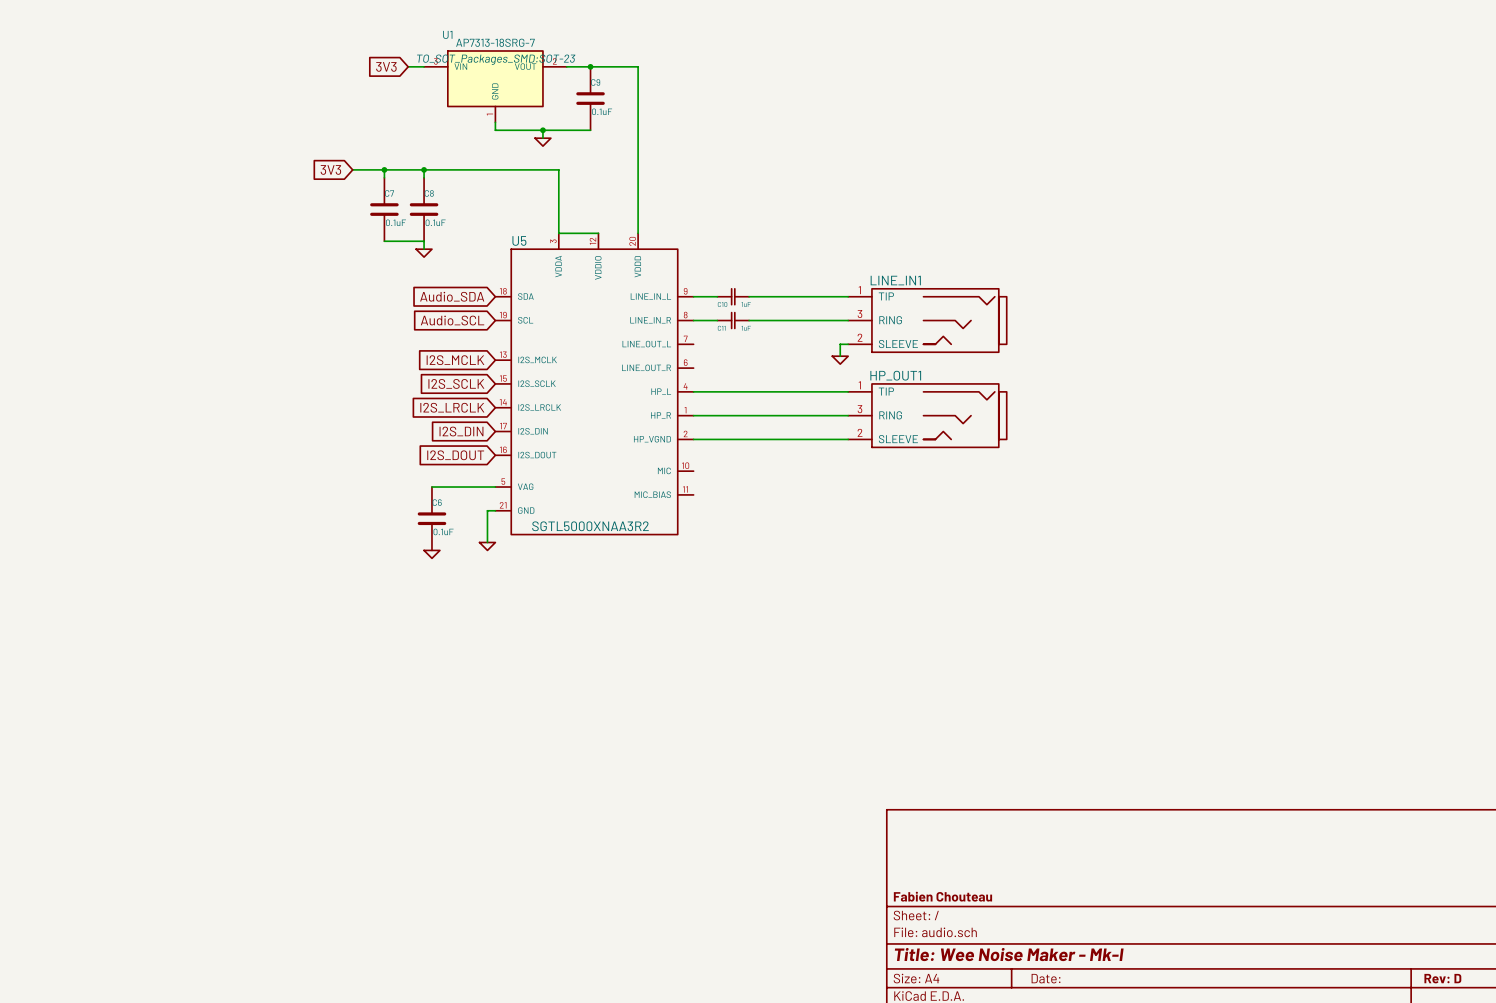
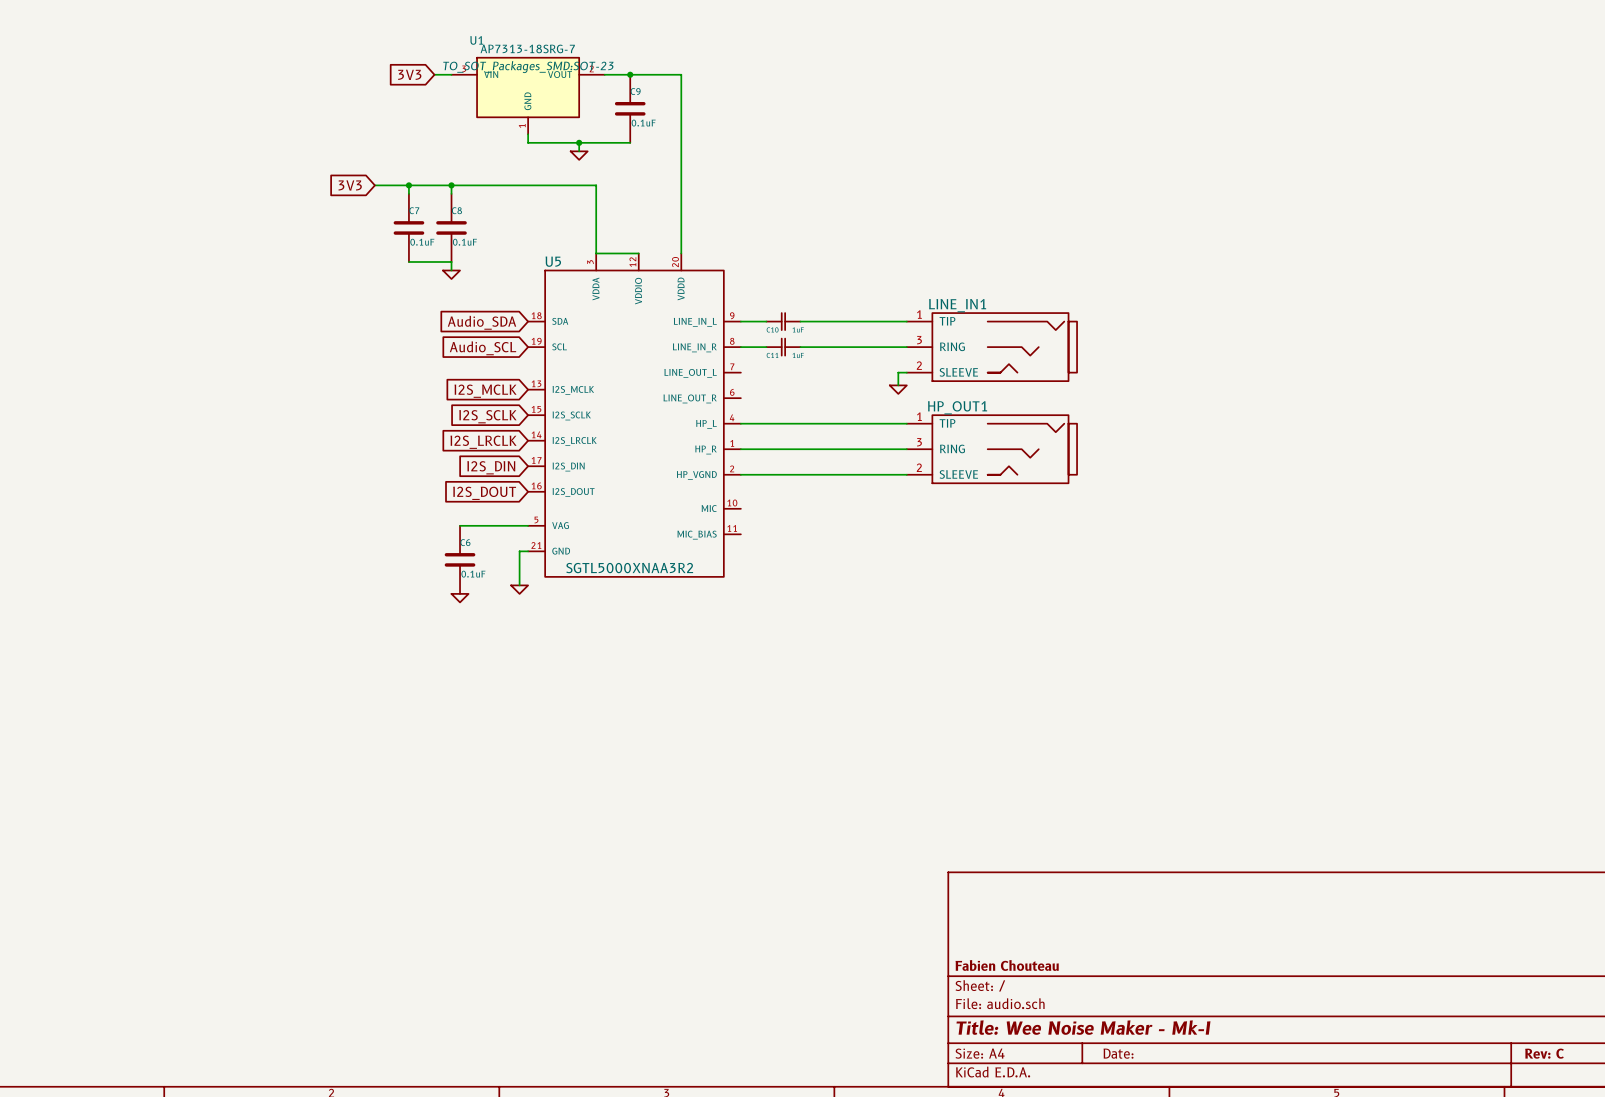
title block: Rev: D (1442, 978) -> Rev: C (1544, 1053)

